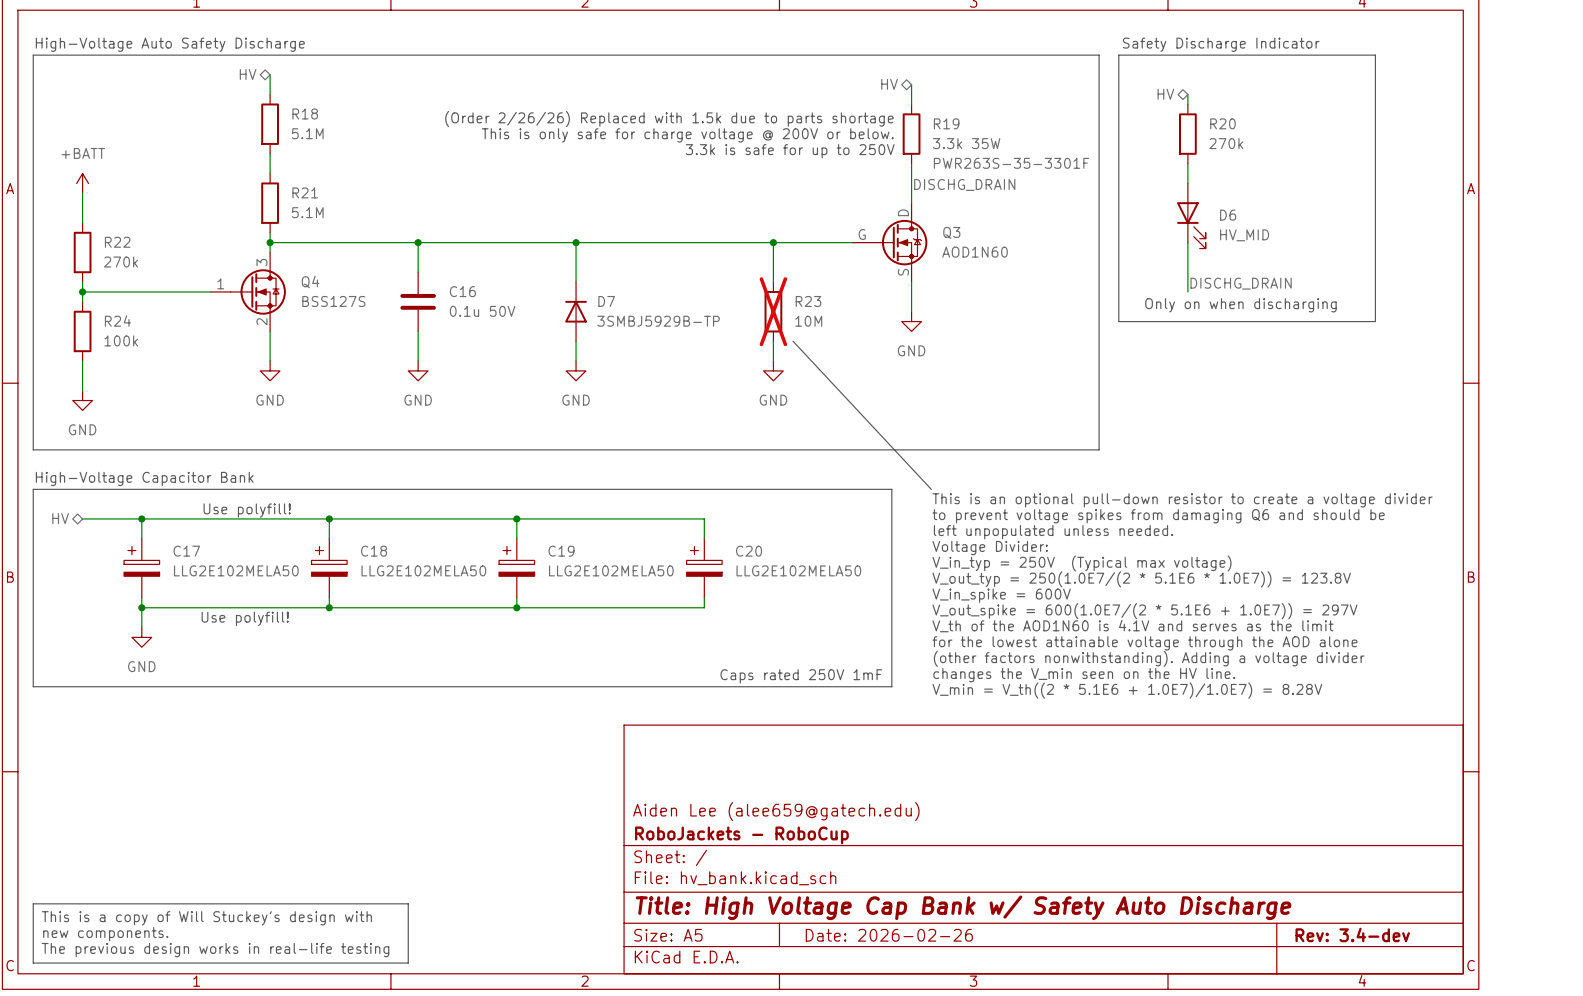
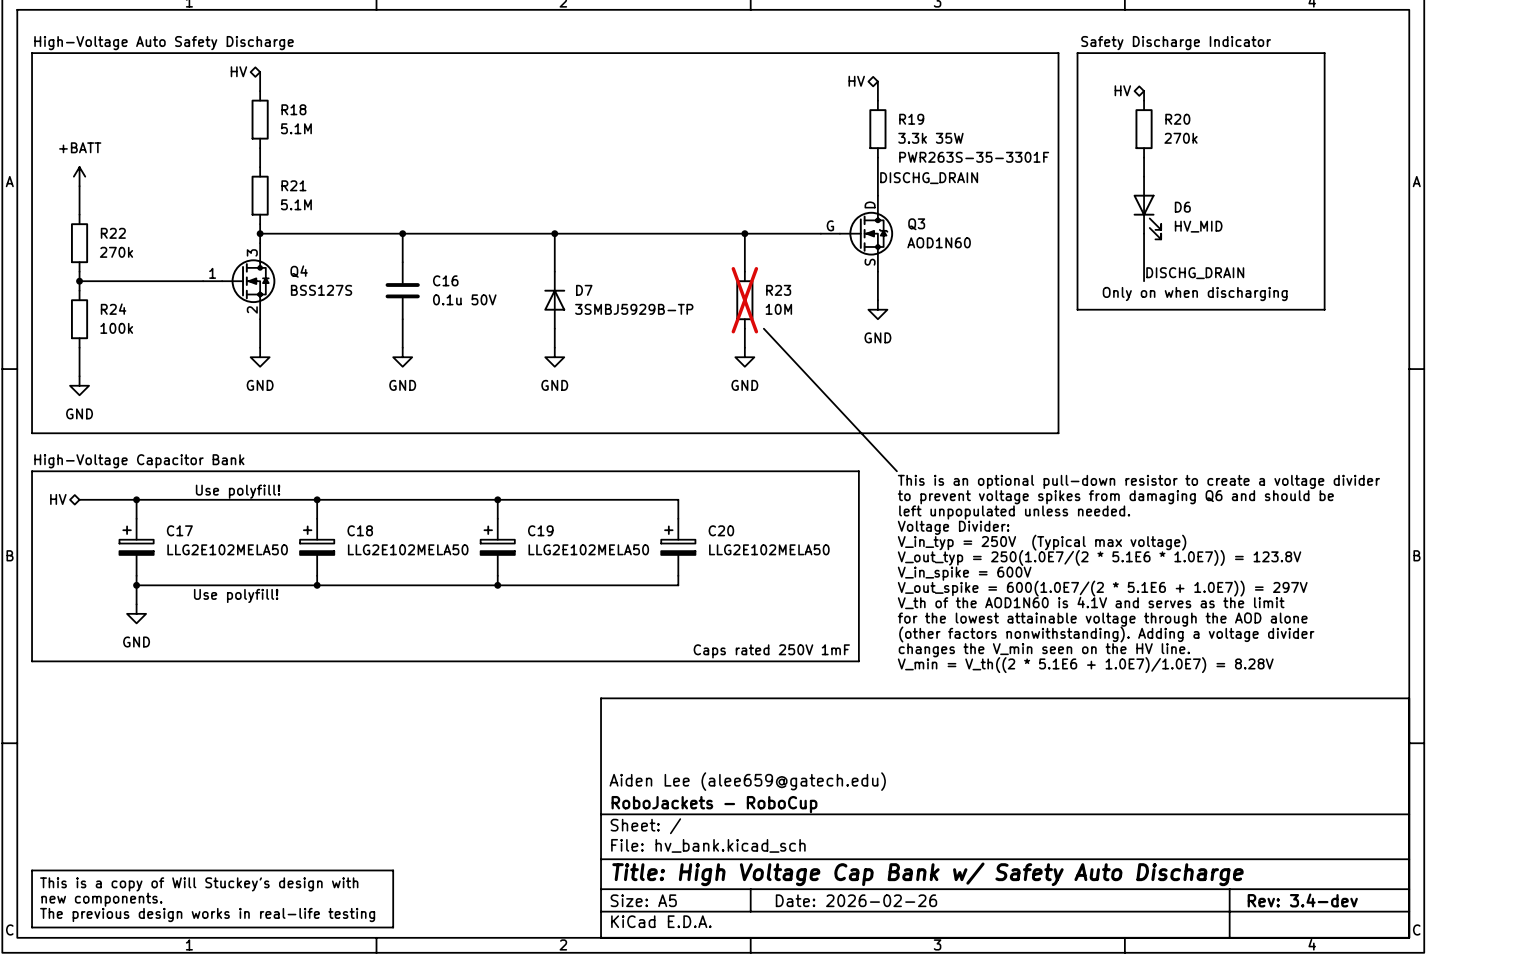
text: (Order 2/26/26) Replaced with 1.5k due to parts shortage (669, 119) -> none
text: This is only safe for charge voltage @ 200V or below. (687, 135) -> none
text: 3.3k is safe for up to 250V (790, 151) -> none

